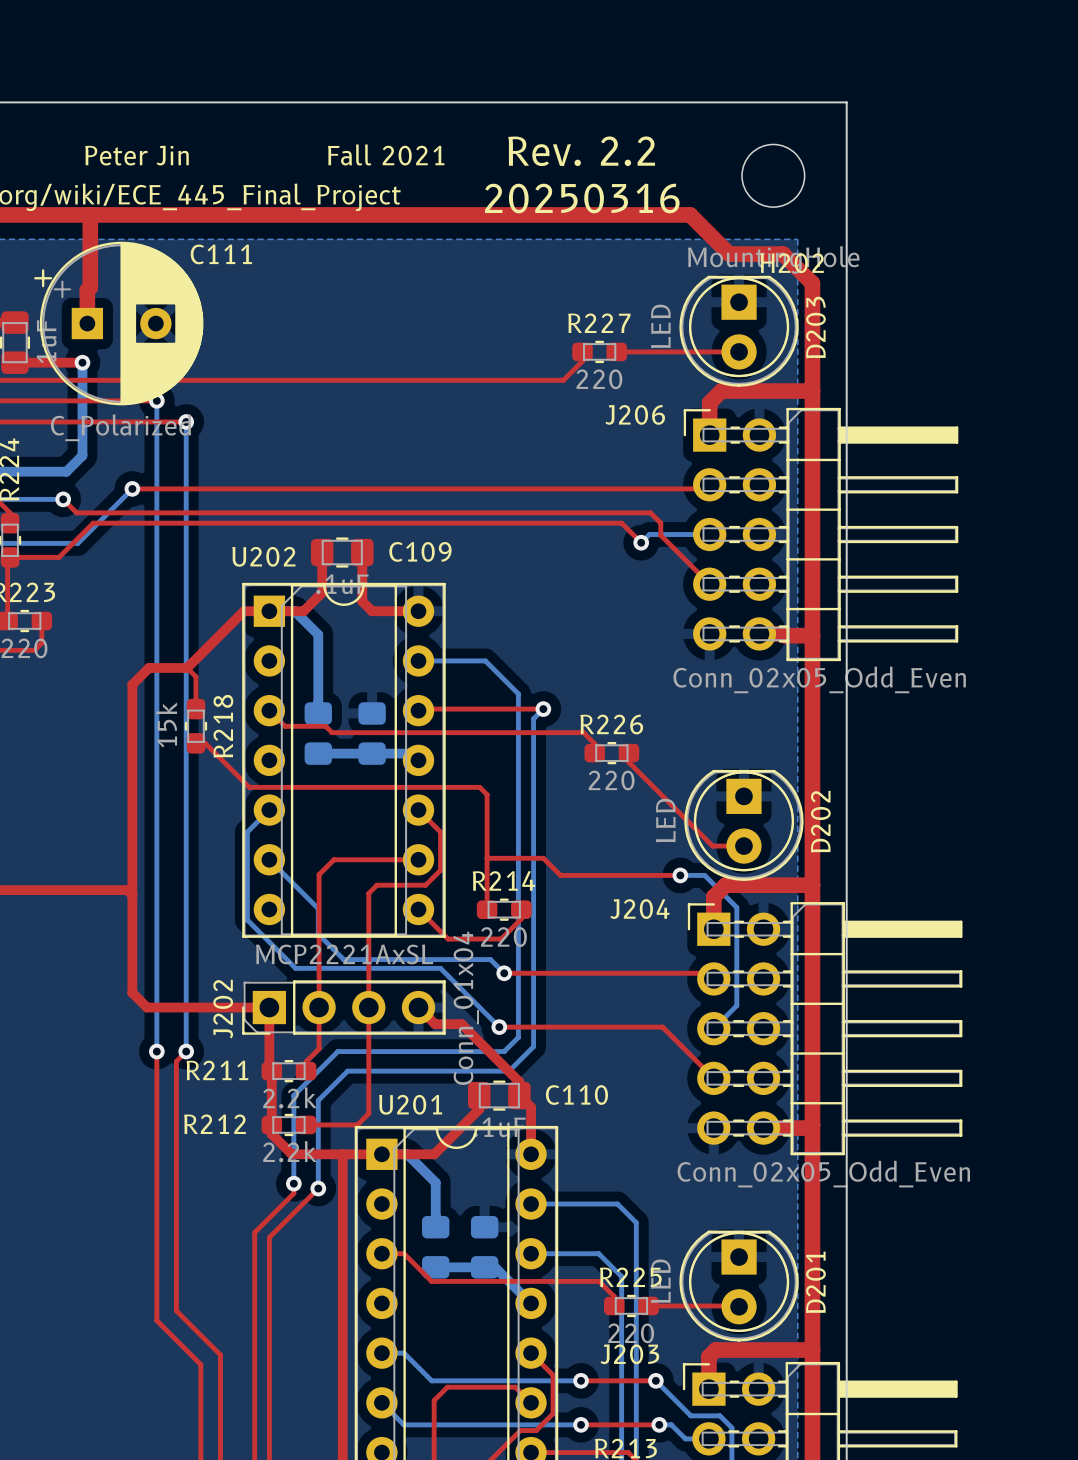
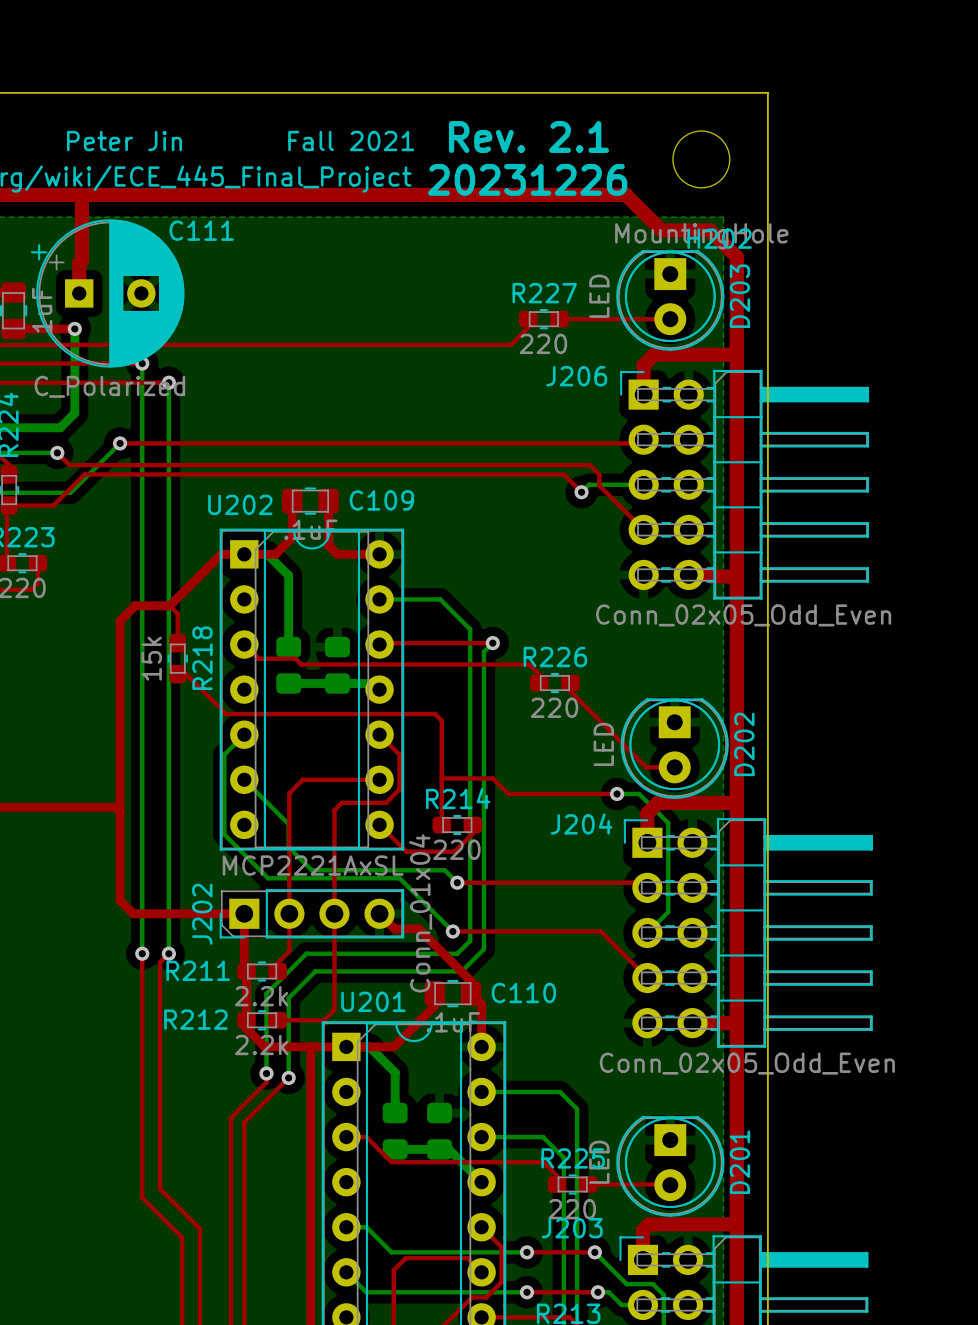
text: Rev. 2.2 (581, 151) -> Rev. 2.1 (528, 137)
text: 20250316 (582, 198) -> 20231226 (527, 179)

